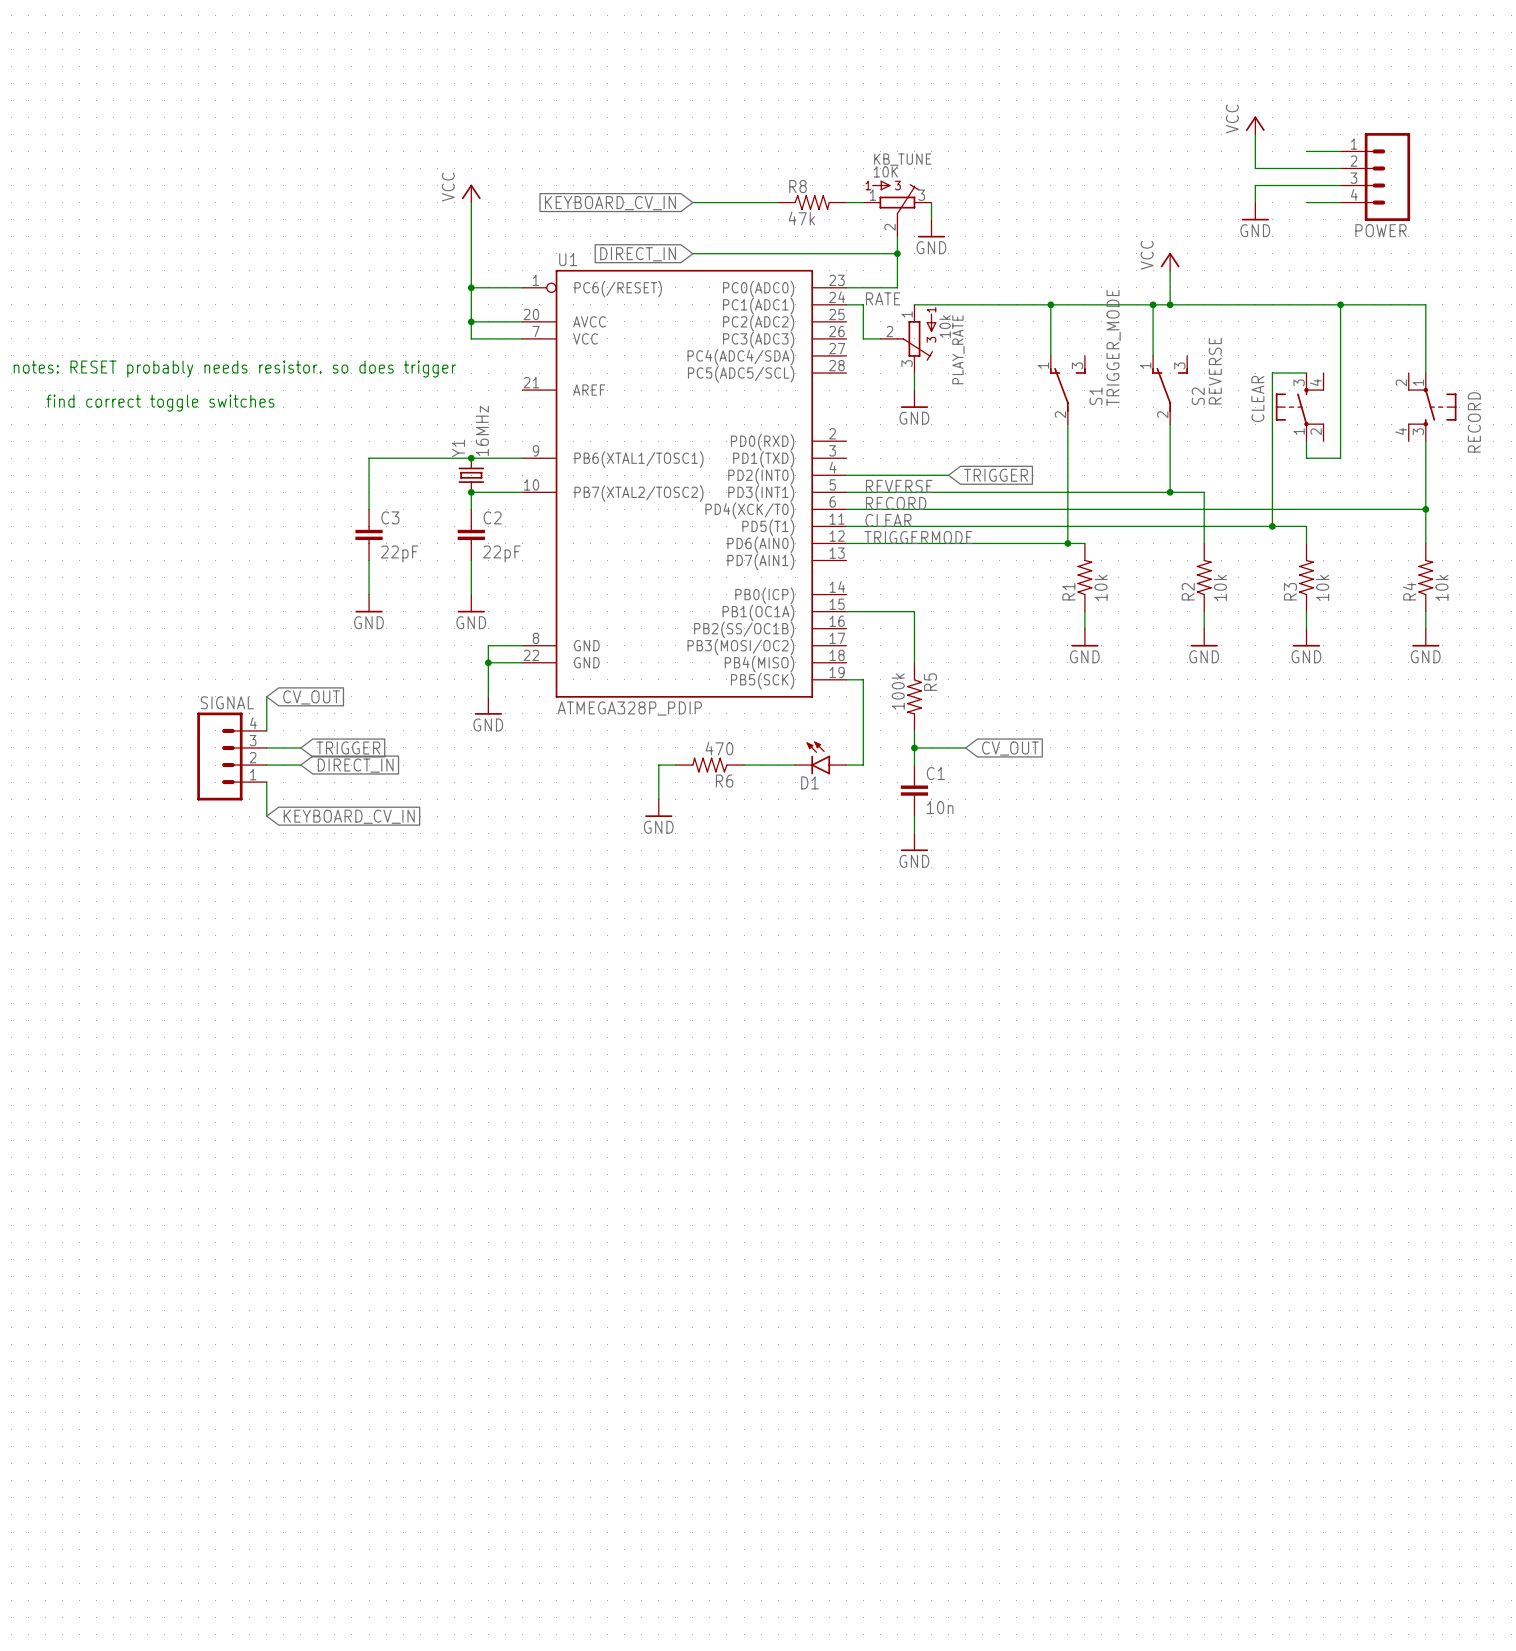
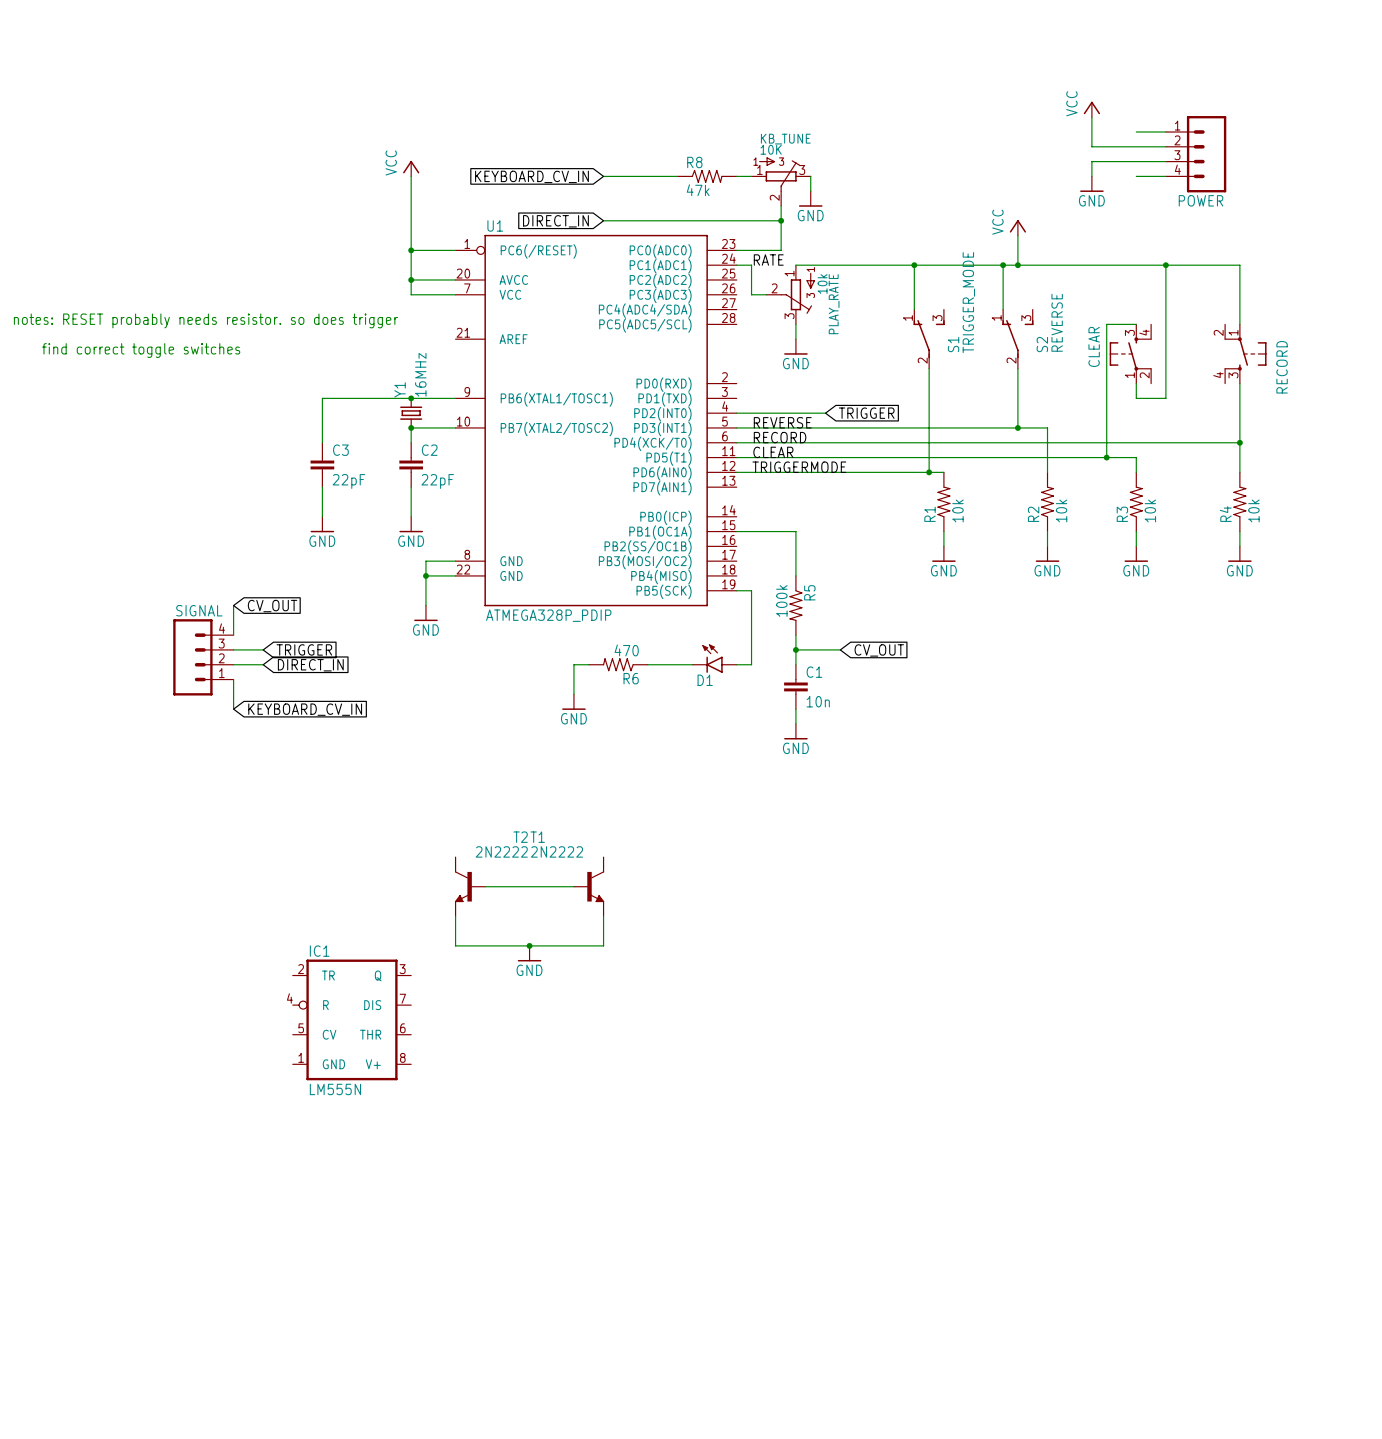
T2: none -> 2N2222 (470, 886)
wire: none -> (485, 886) (573, 886)
T1: none -> 2N2222 (588, 886)
wire: none -> (455, 916) (455, 945) (603, 945) (603, 916)
junction: none -> (529, 945)
power symbol: none -> GND (529, 953)
IC1: none -> LM555N (351, 1019)

